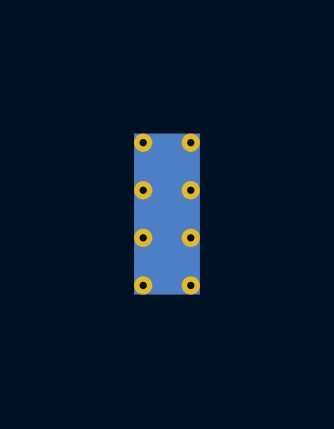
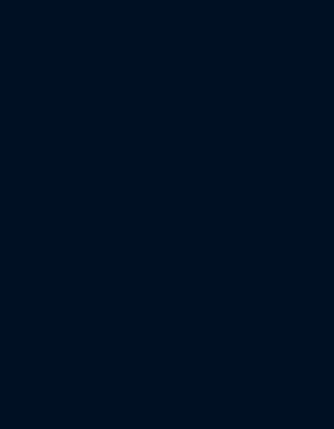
part: (166, 214) -> none

